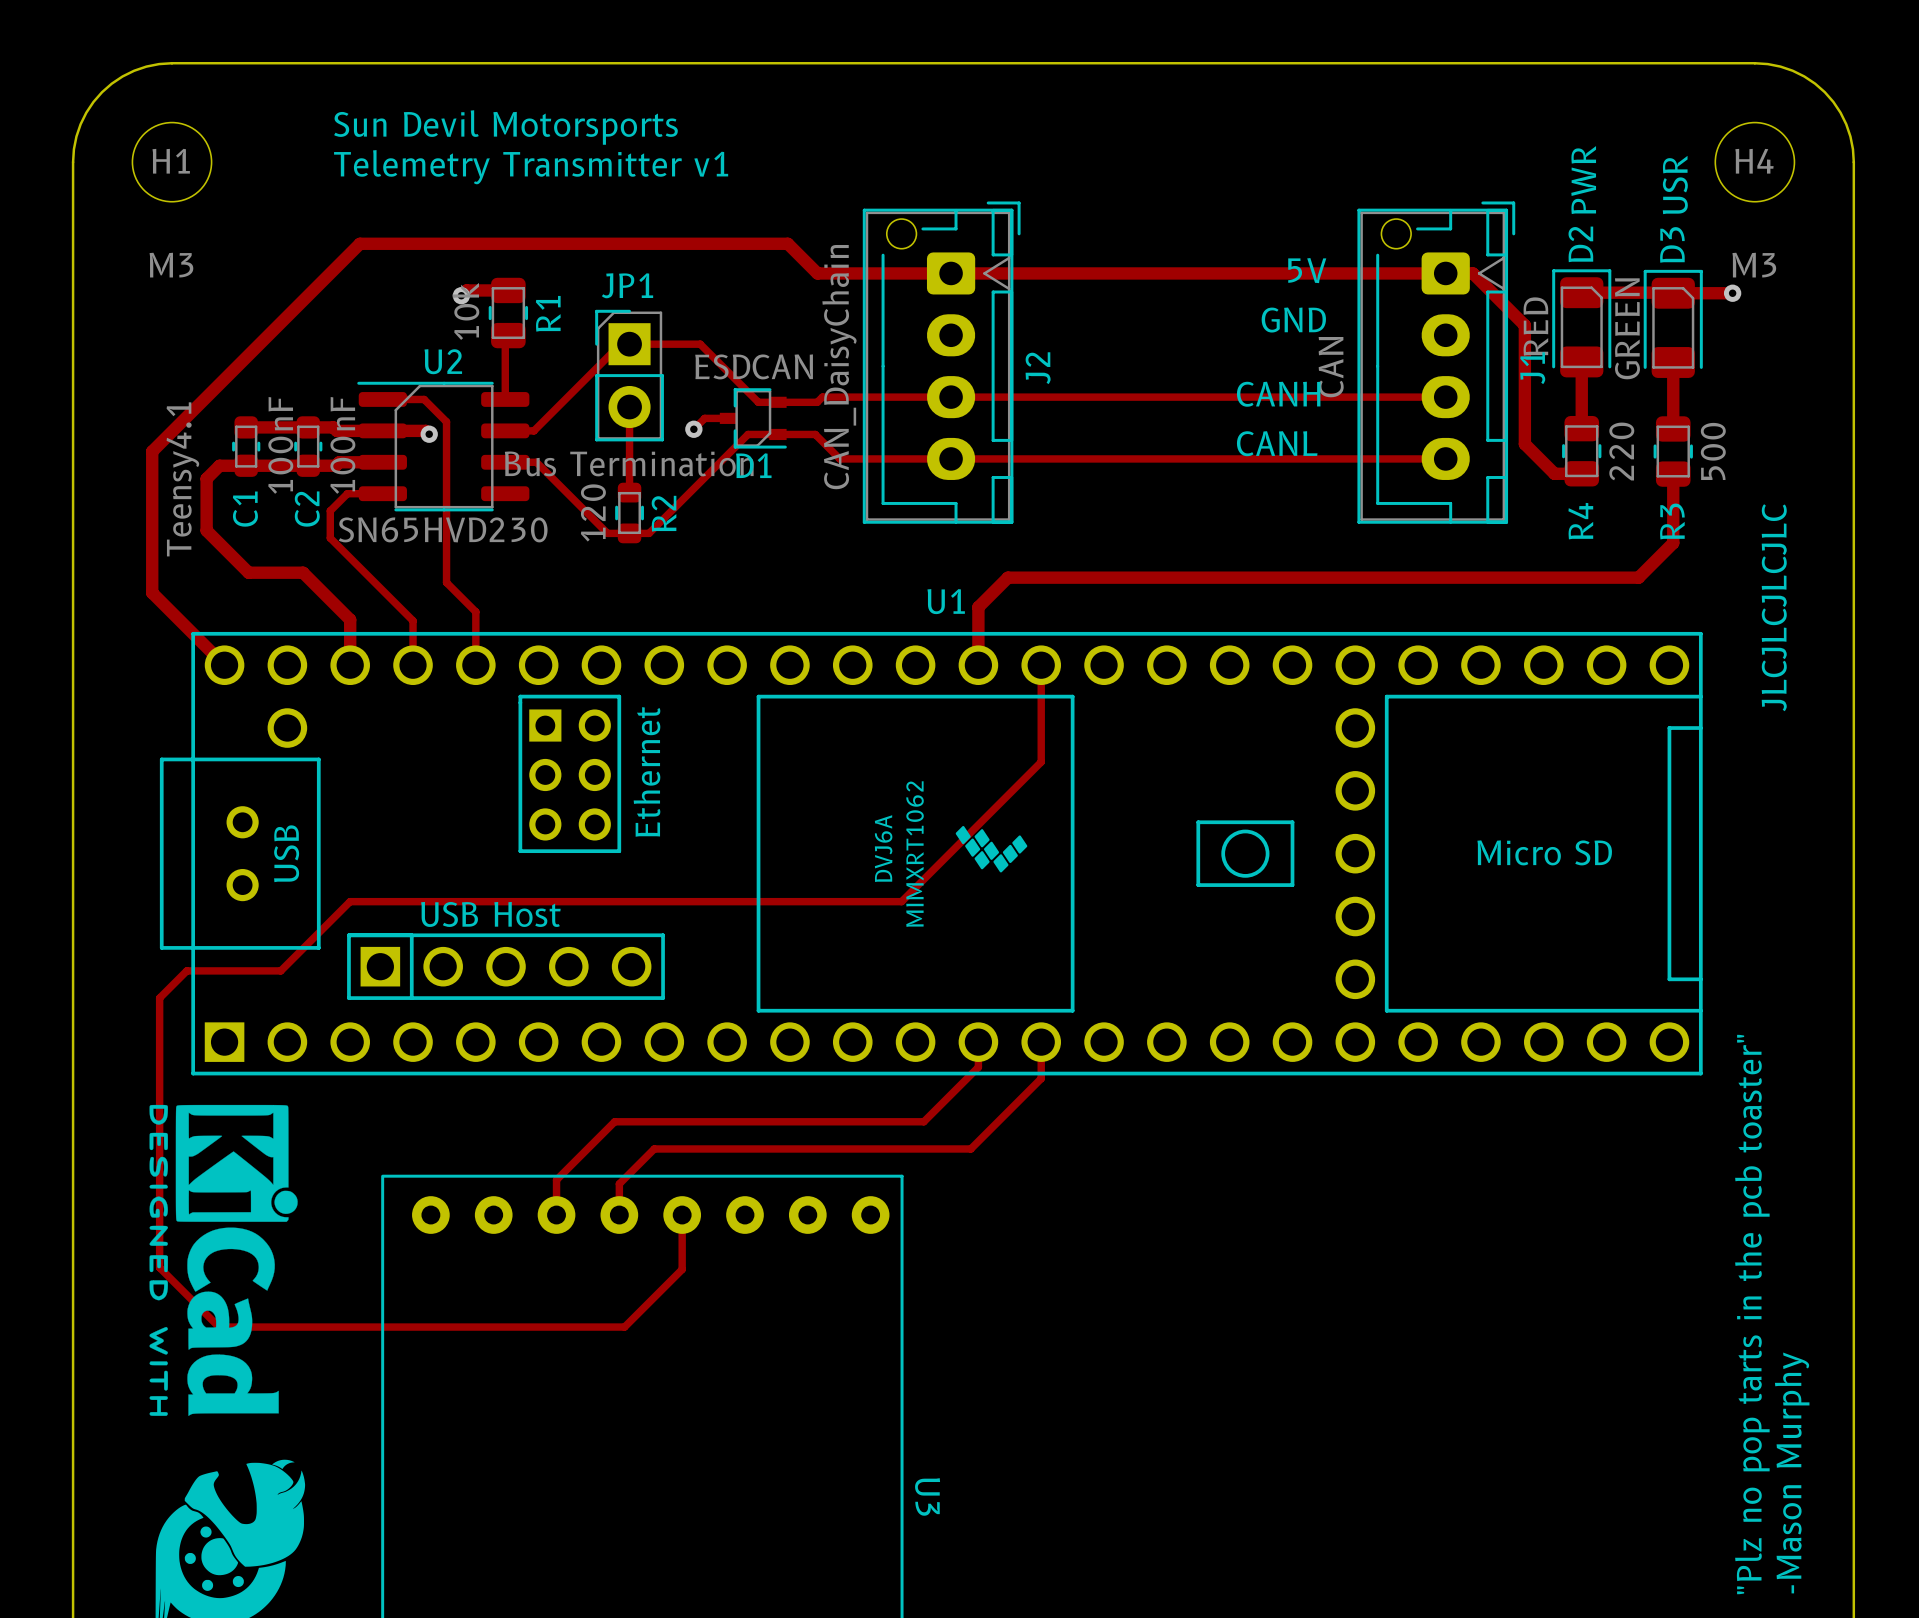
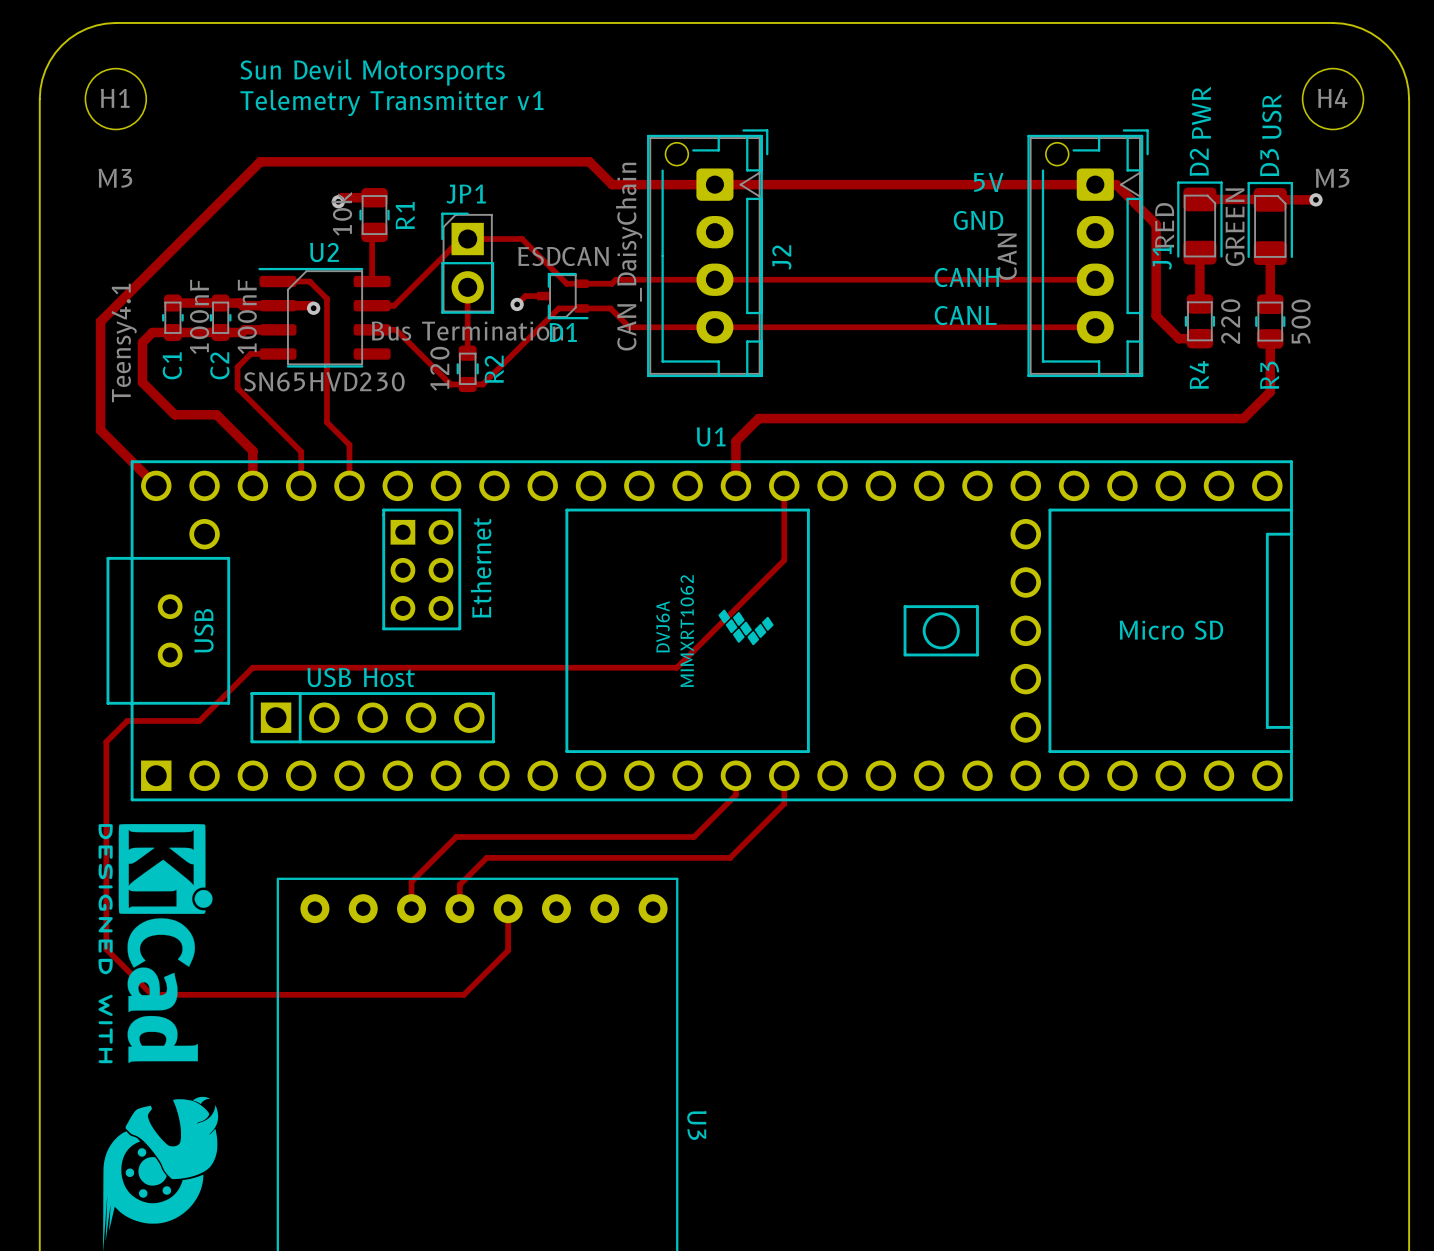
text: JLCJLCJLCJLC (1774, 607) -> none
text: "Plz no pop tarts in the pcb toaster" (1752, 1314) -> none
text: -Mason Murphy (1792, 1472) -> none

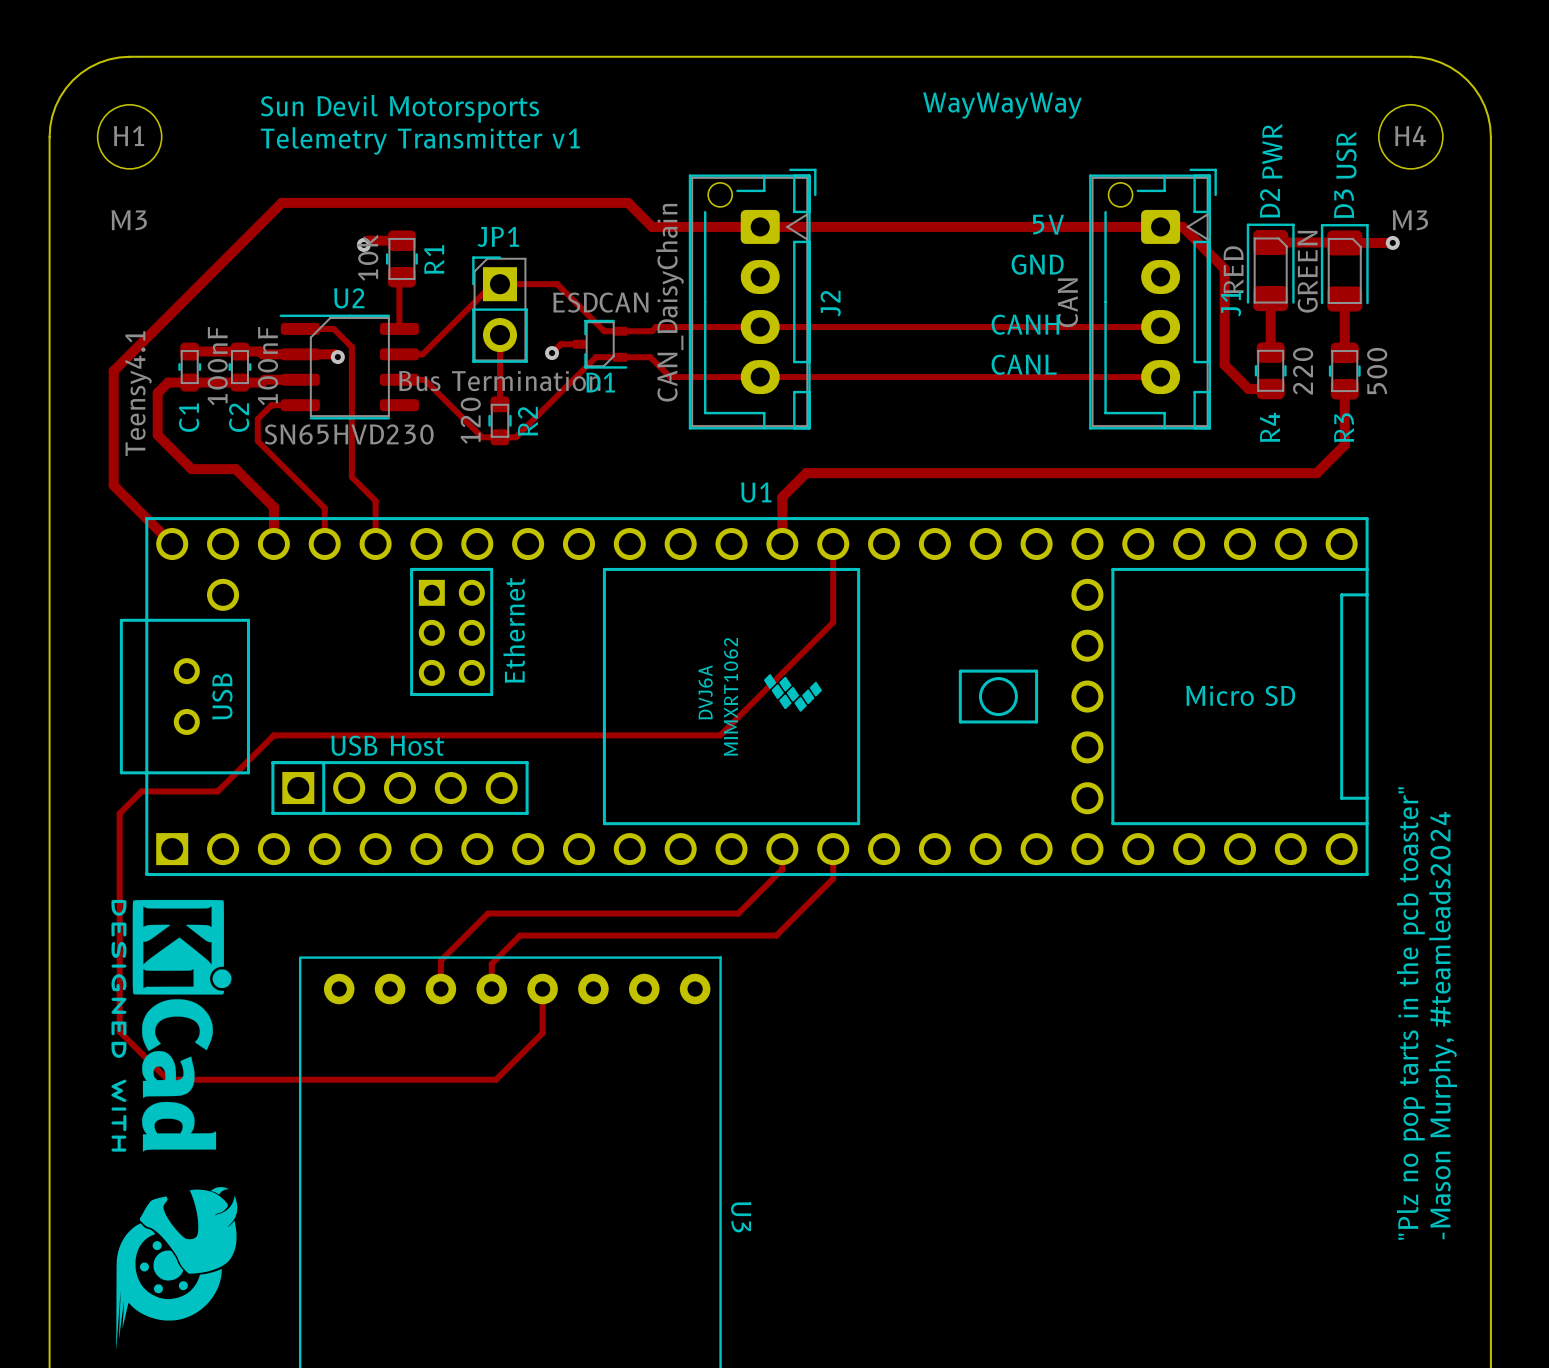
text: none -> WayWayWay (1002, 105)
text: none -> "Plz no pop tarts in the pcb toaster" (1410, 1013)
text: none -> -Mason Murphy, #teamleads2024 (1443, 1025)

